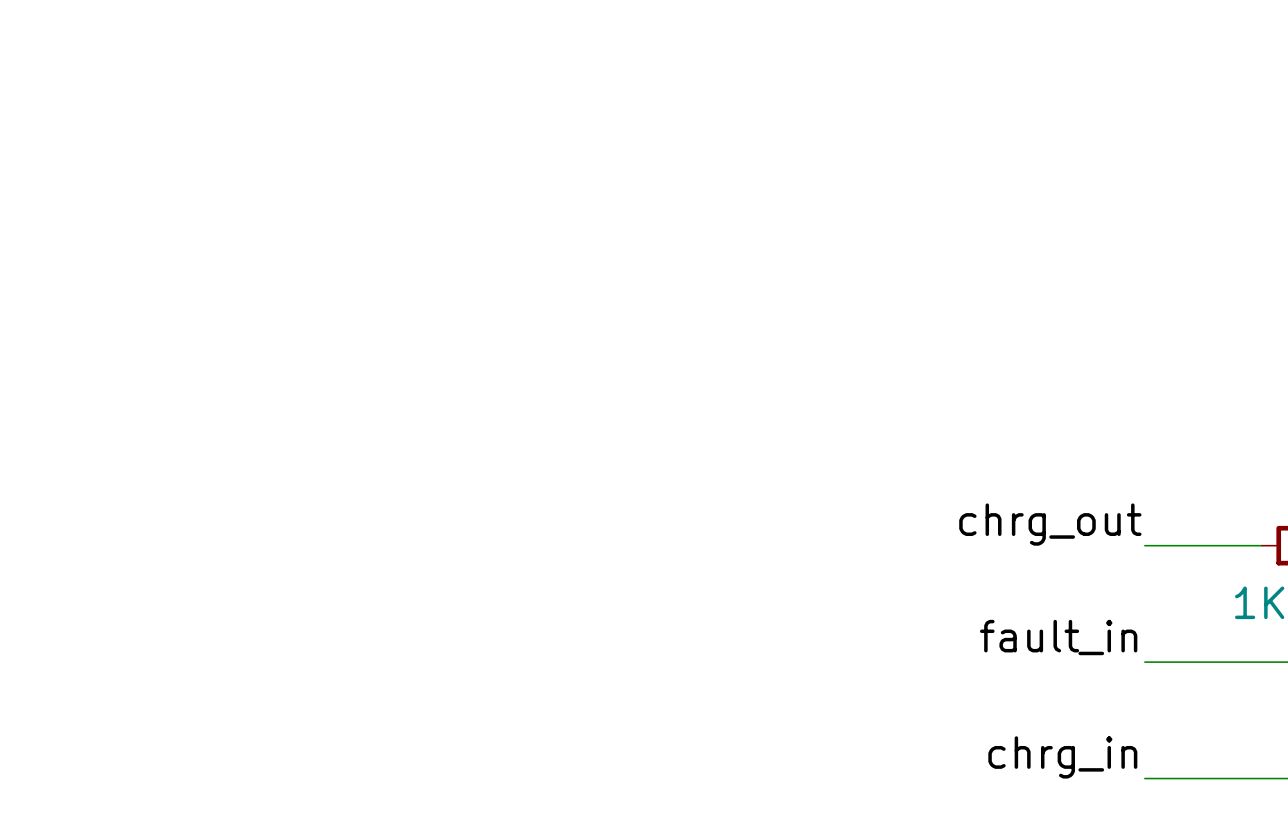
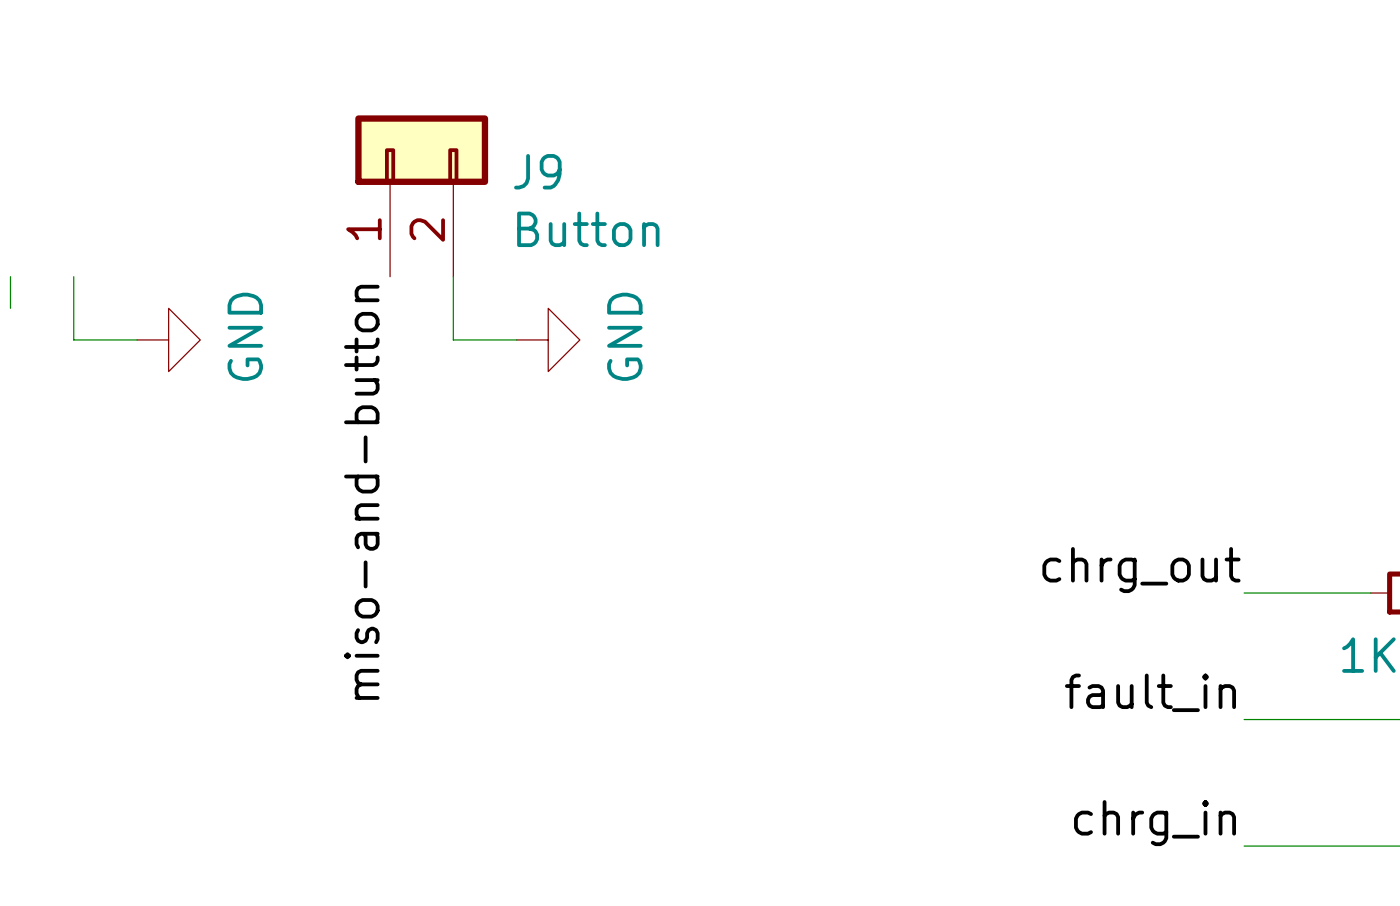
J9: none -> Button (421, 196)
wire: none -> (10, 276) (10, 308)
wire: none -> (73, 276) (73, 339) (137, 339)
wire: none -> (453, 276) (453, 339) (516, 339)
power symbol: none -> GND (168, 339)
power symbol: none -> GND (548, 339)
label: none -> miso-and-button (361, 492)

